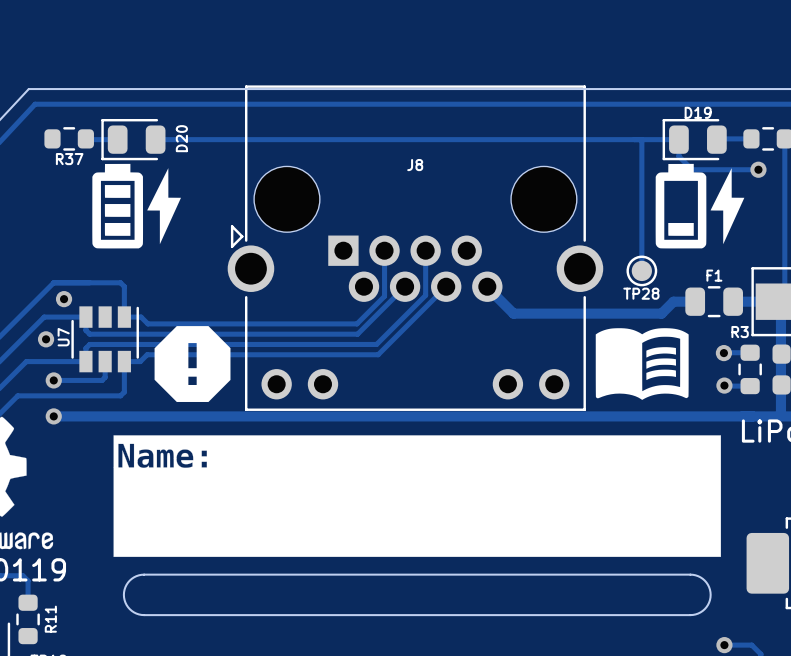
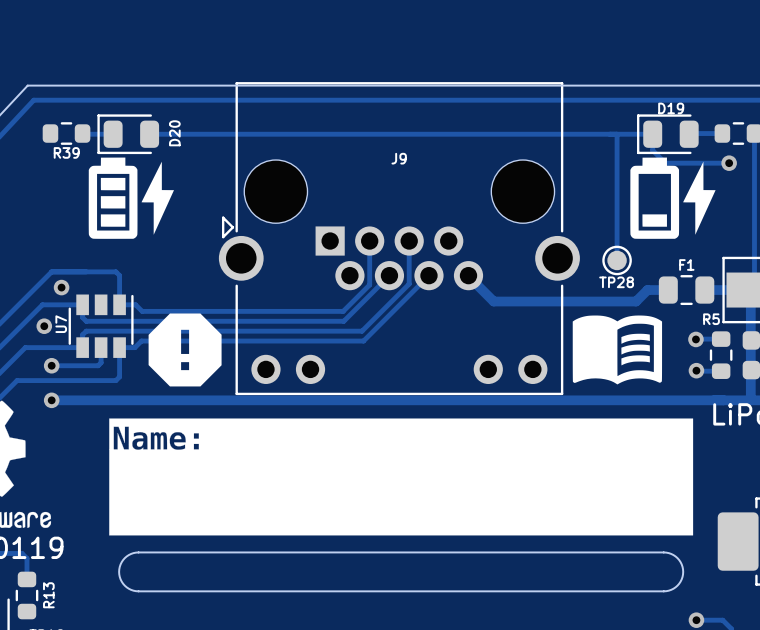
R37 name: R37 (69, 159) -> R39 (66, 152)
J8 name: J8 (415, 165) -> J9 (399, 158)
R3 name: R3 (740, 332) -> R5 (711, 319)
R11 name: R11 (50, 619) -> R13 (48, 595)

